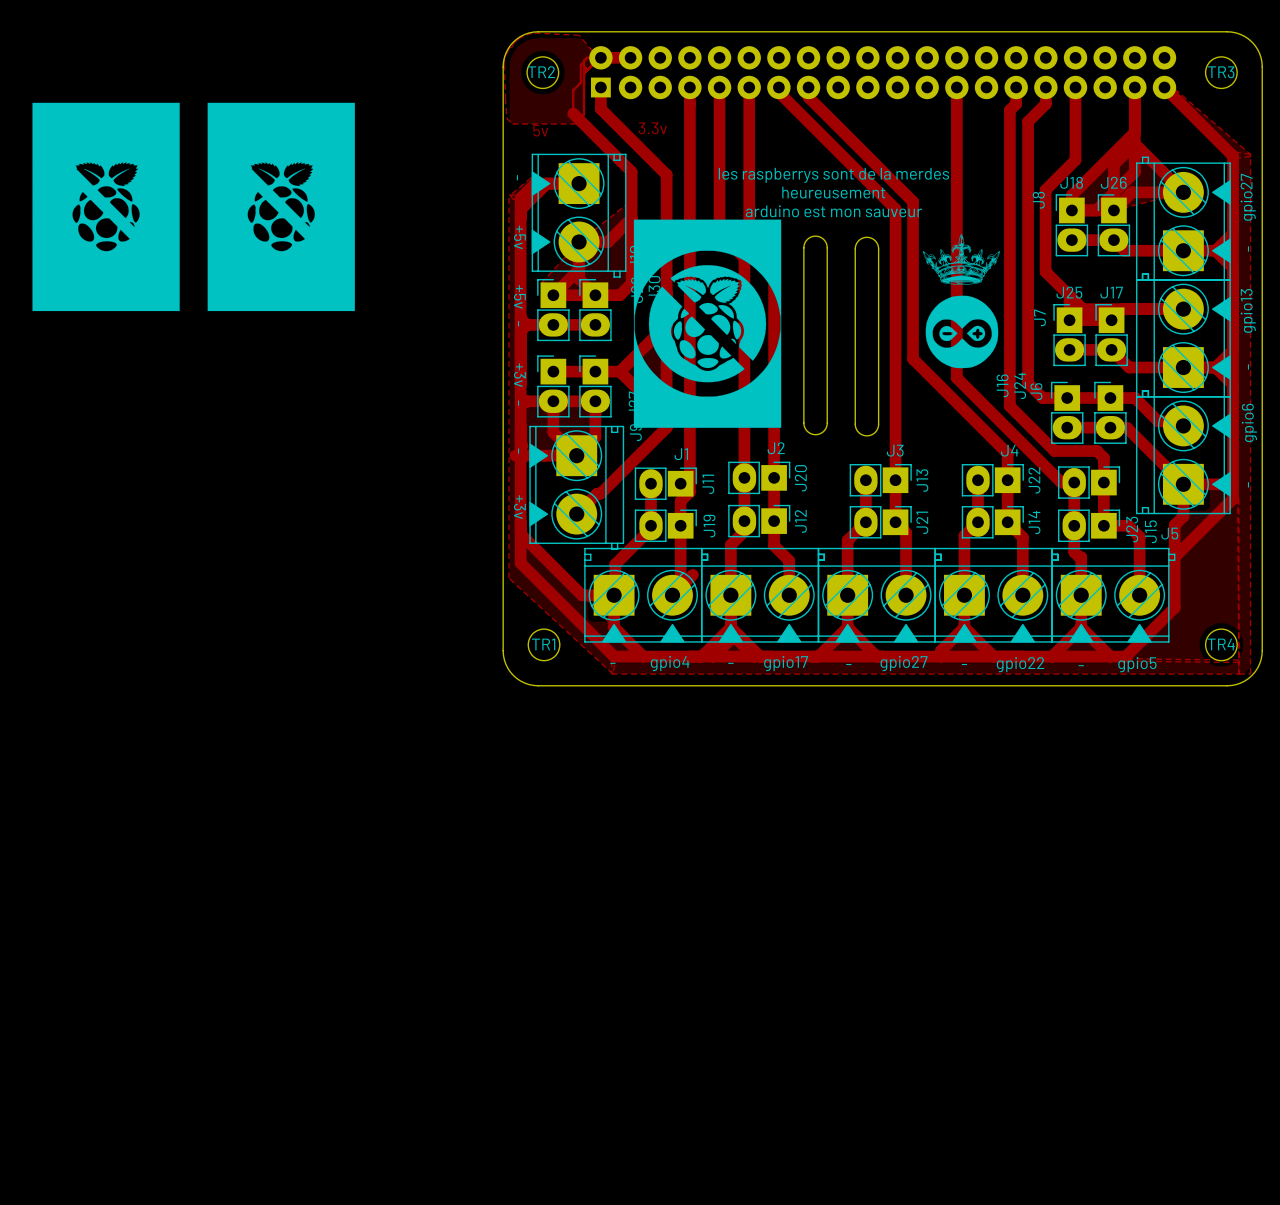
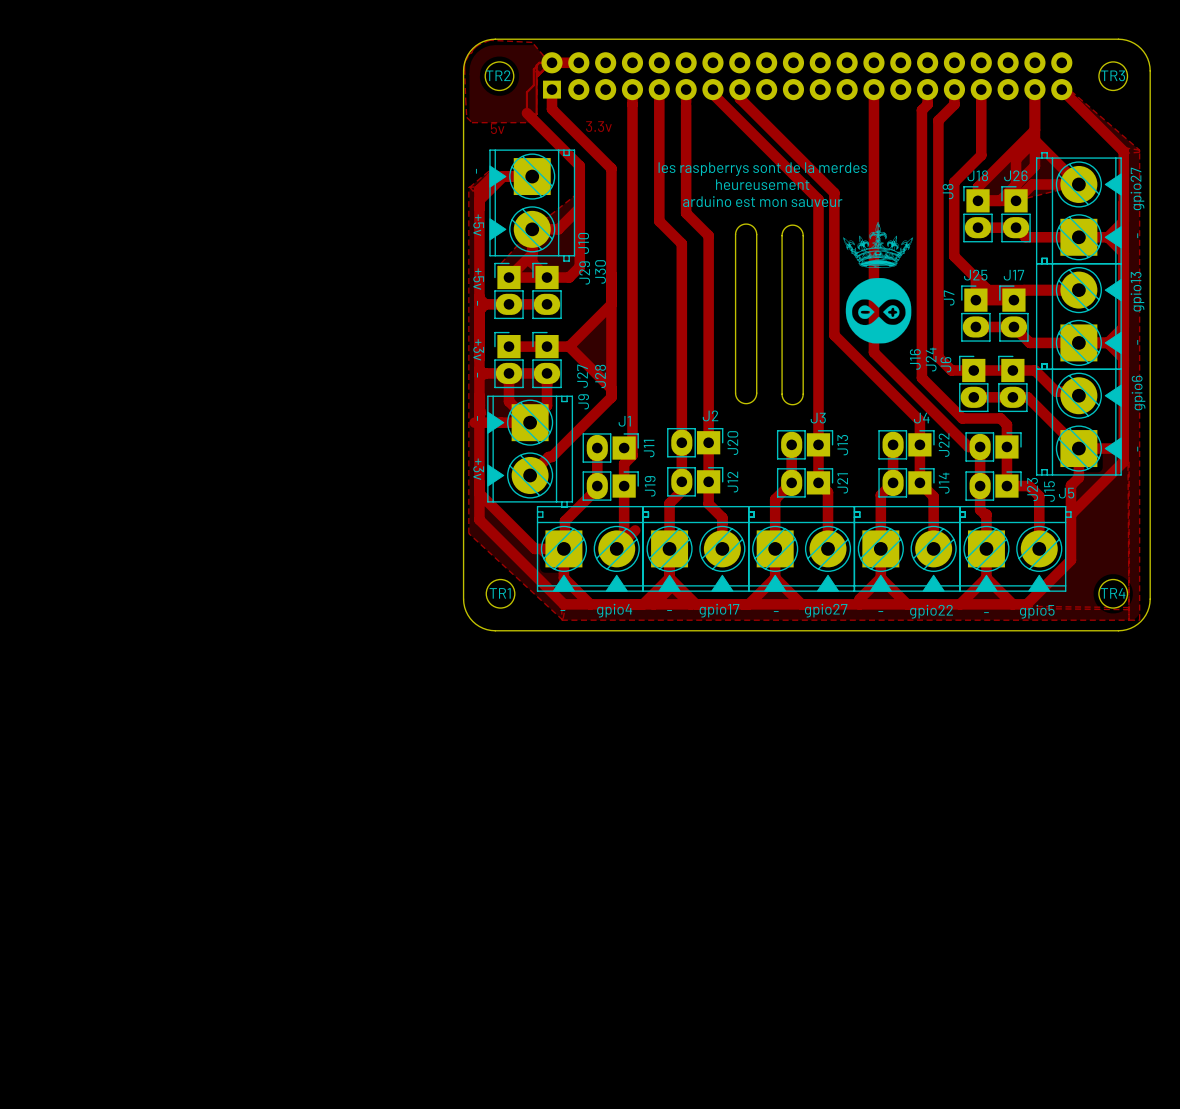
drawing: [32, 102, 180, 312] -> none
drawing: [207, 102, 355, 312] -> none
drawing: [633, 219, 782, 428] -> none

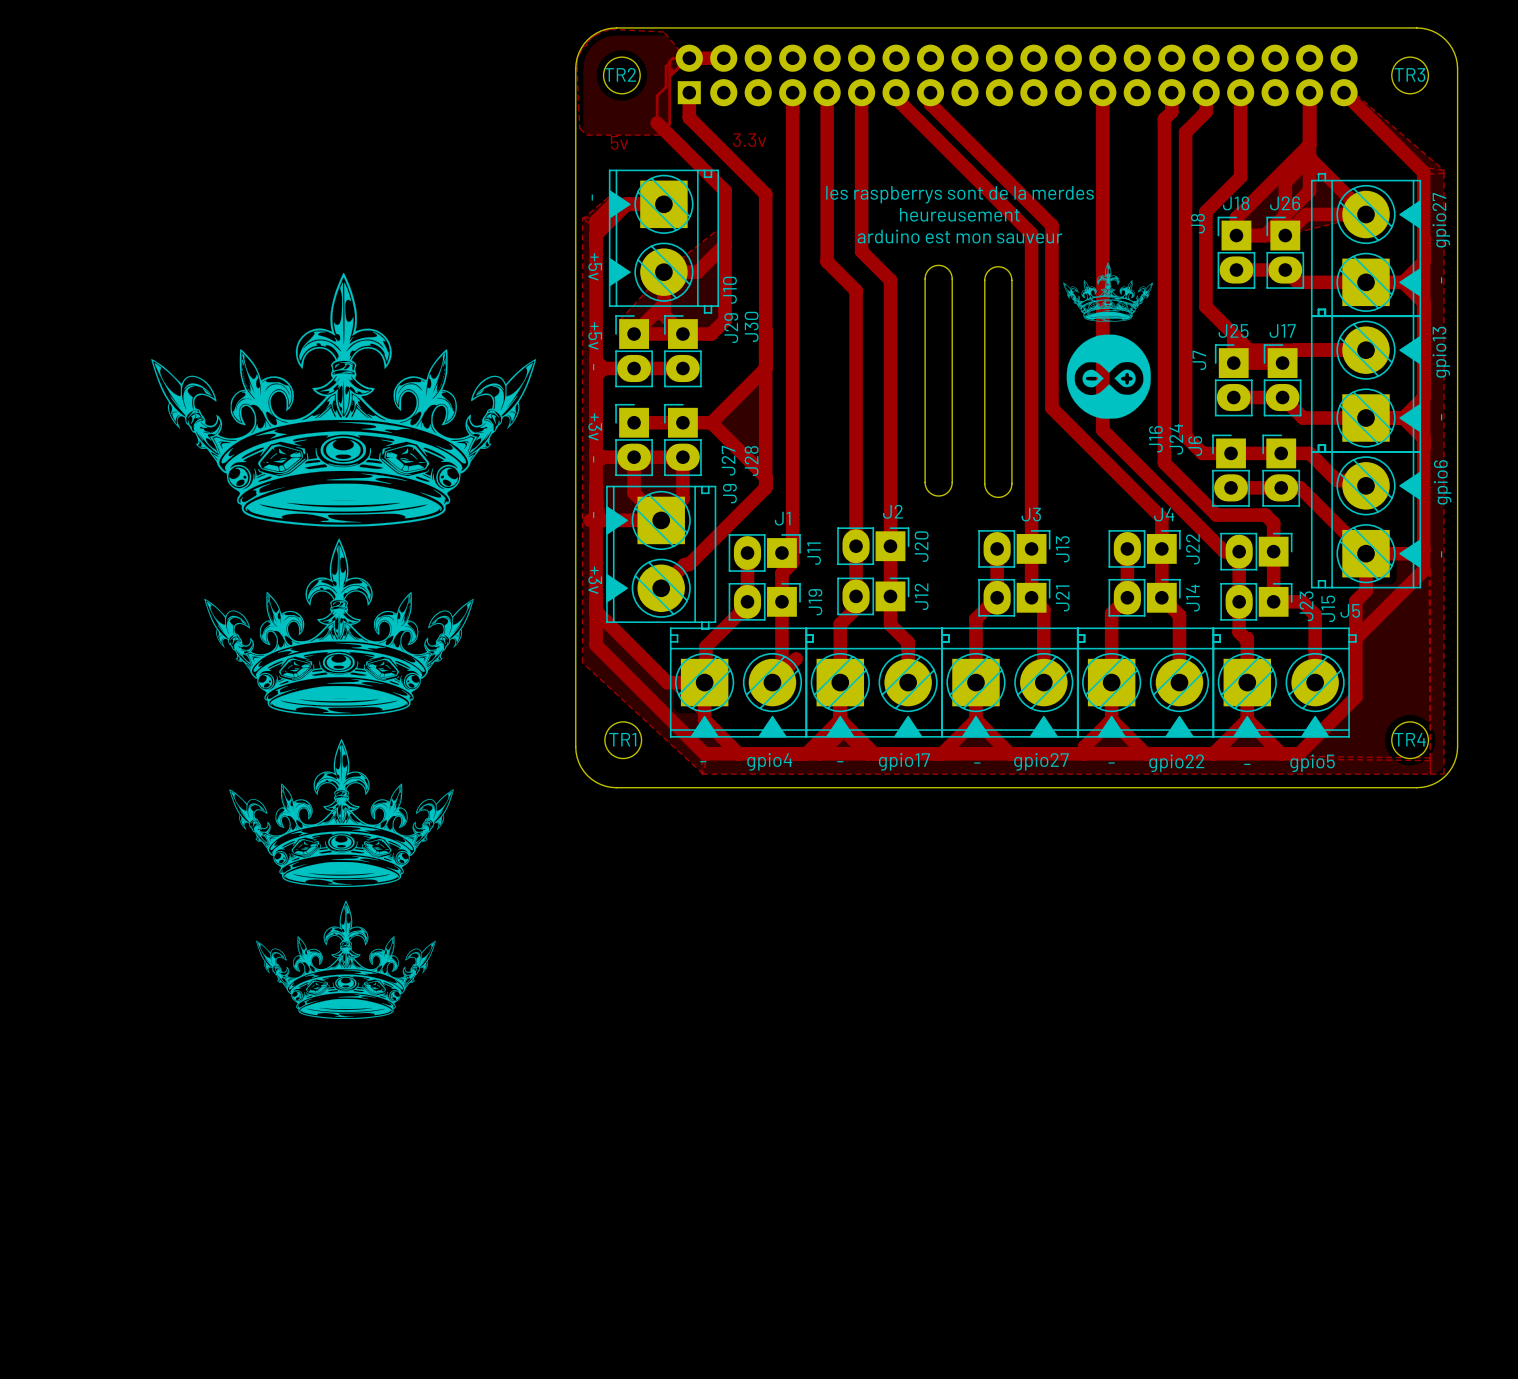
drawing: none -> [151, 272, 537, 717]
drawing: none -> [229, 738, 454, 1020]

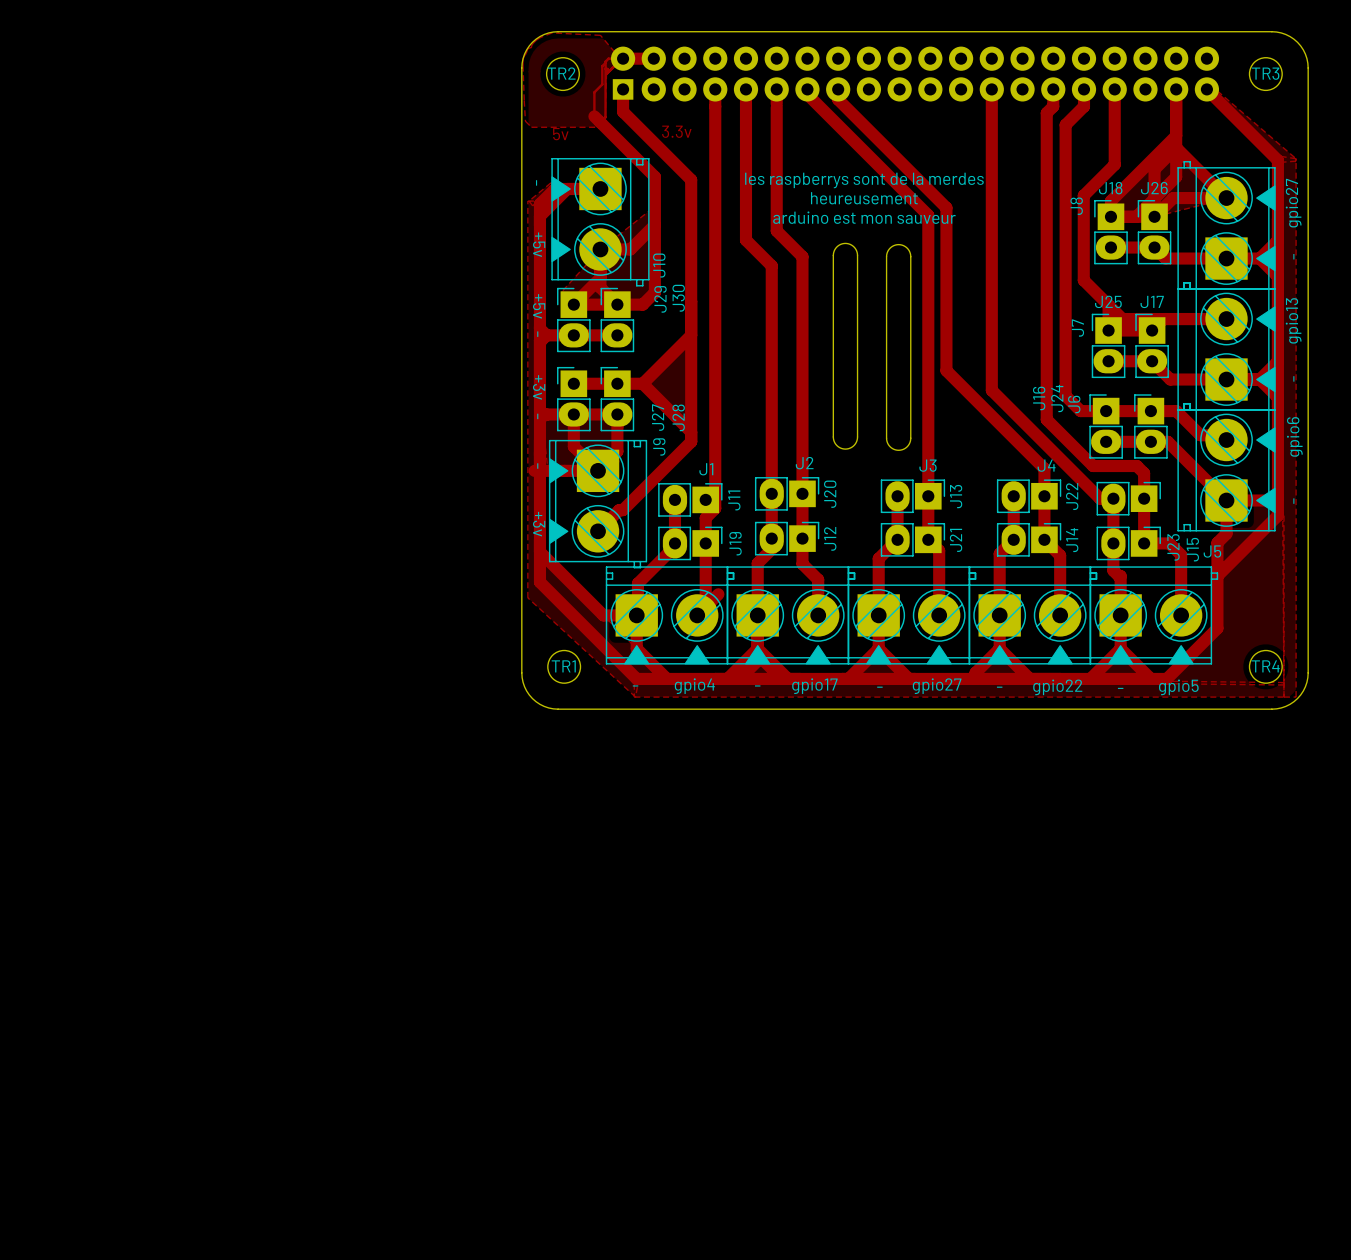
drawing: [1063, 262, 1154, 419] -> none
drawing: [151, 272, 537, 717] -> none
drawing: [229, 738, 454, 1020] -> none

